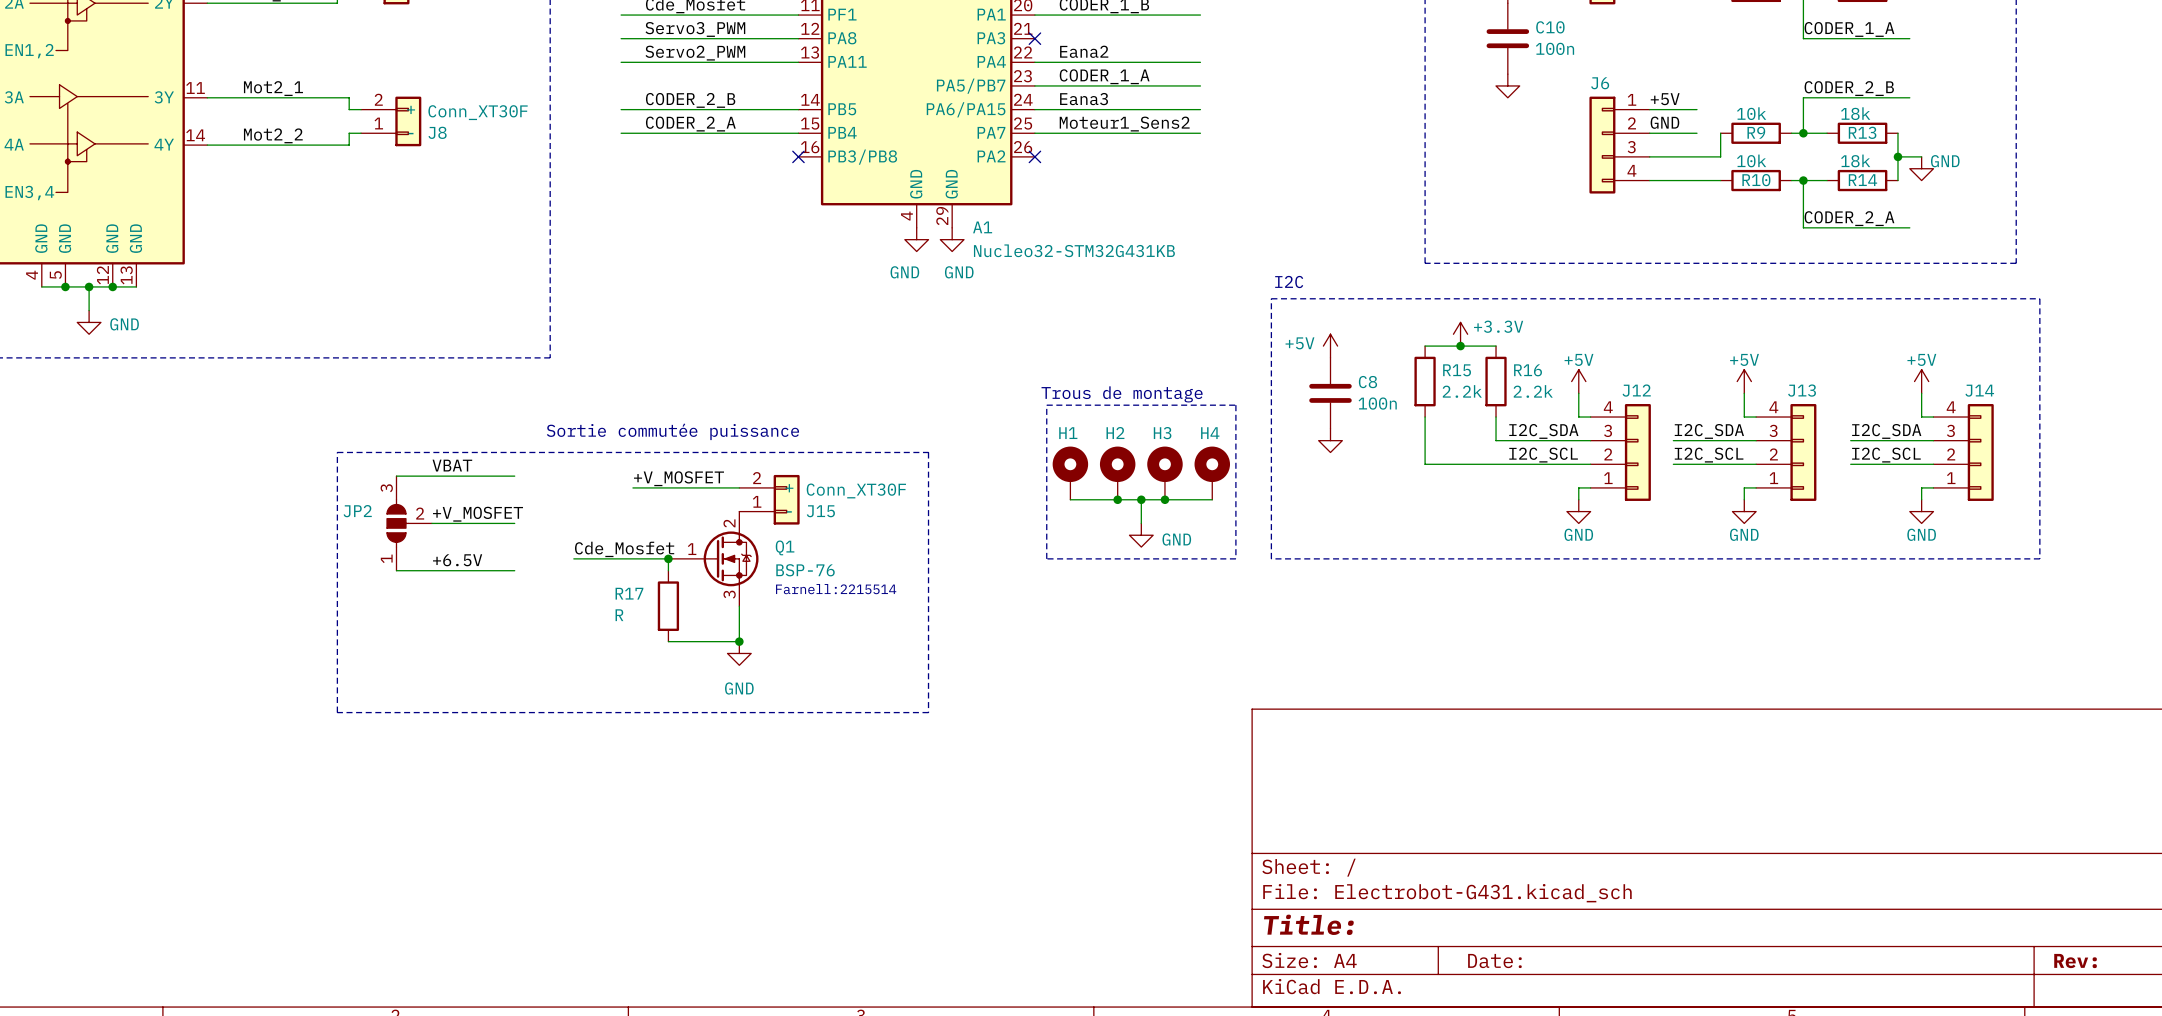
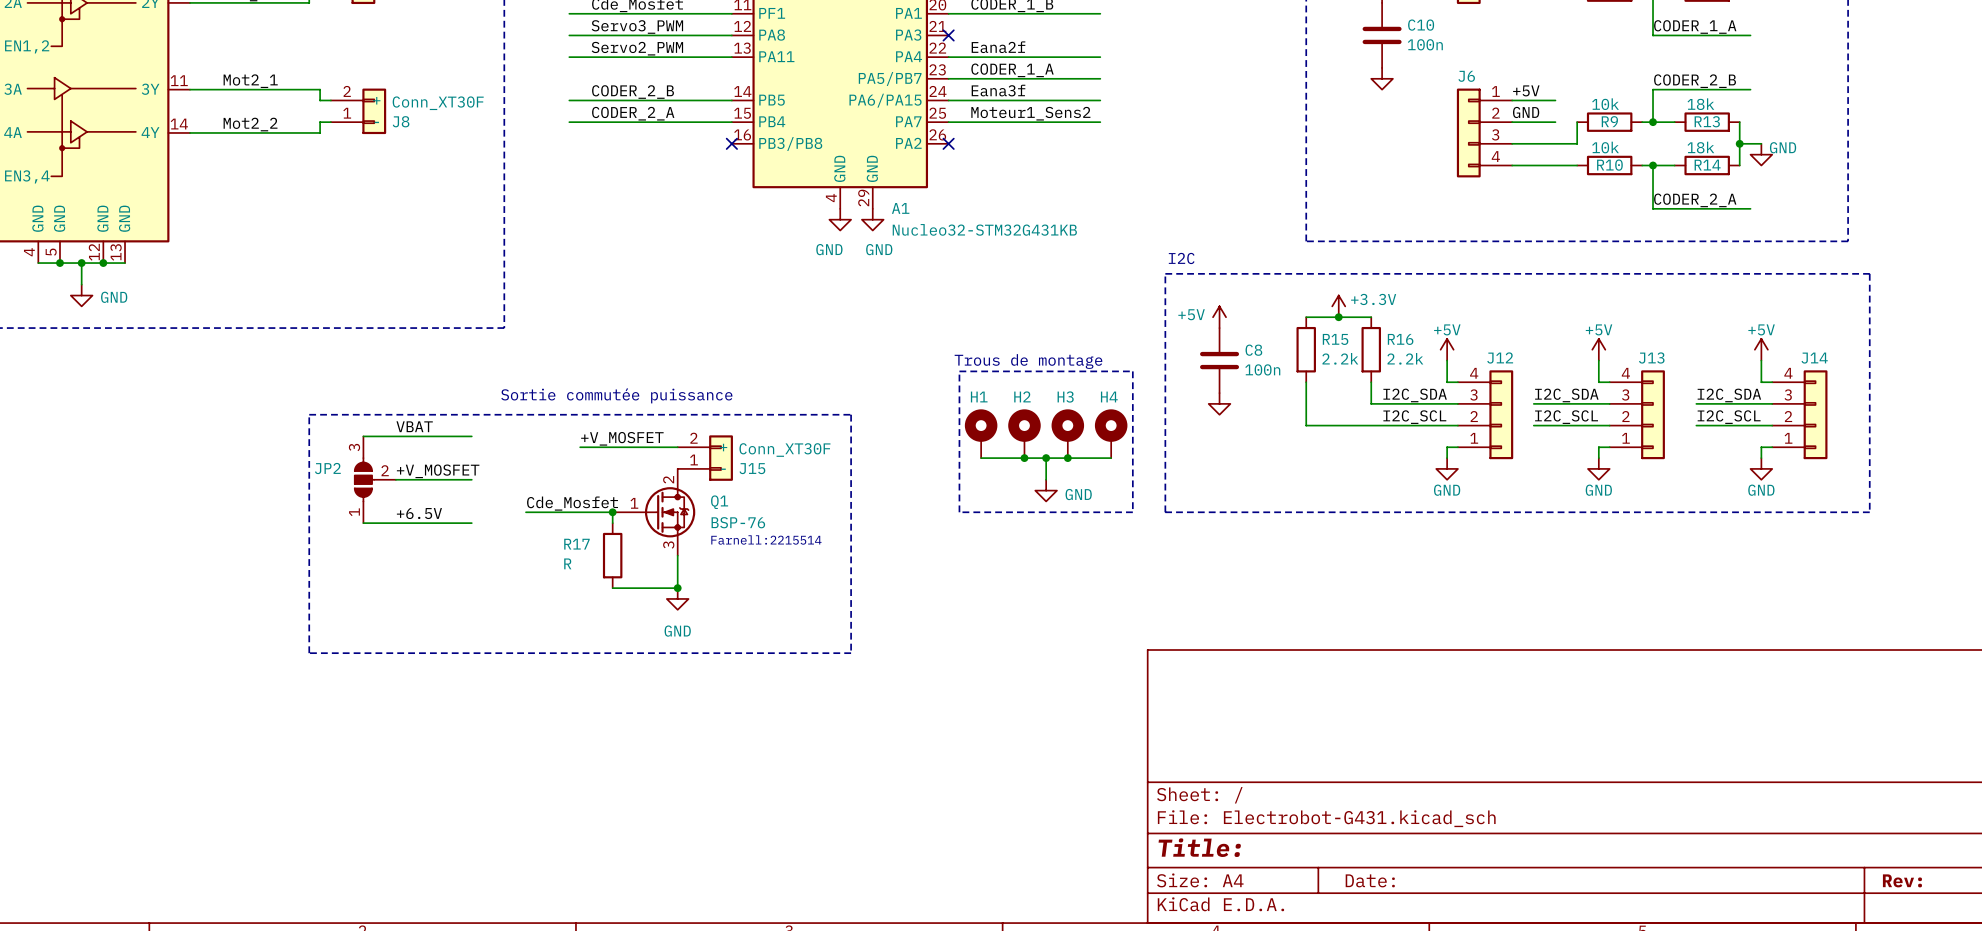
label: Eana2 (1084, 51) -> Eana2f (998, 47)
label: Eana3 (1084, 99) -> Eana3f (998, 90)

